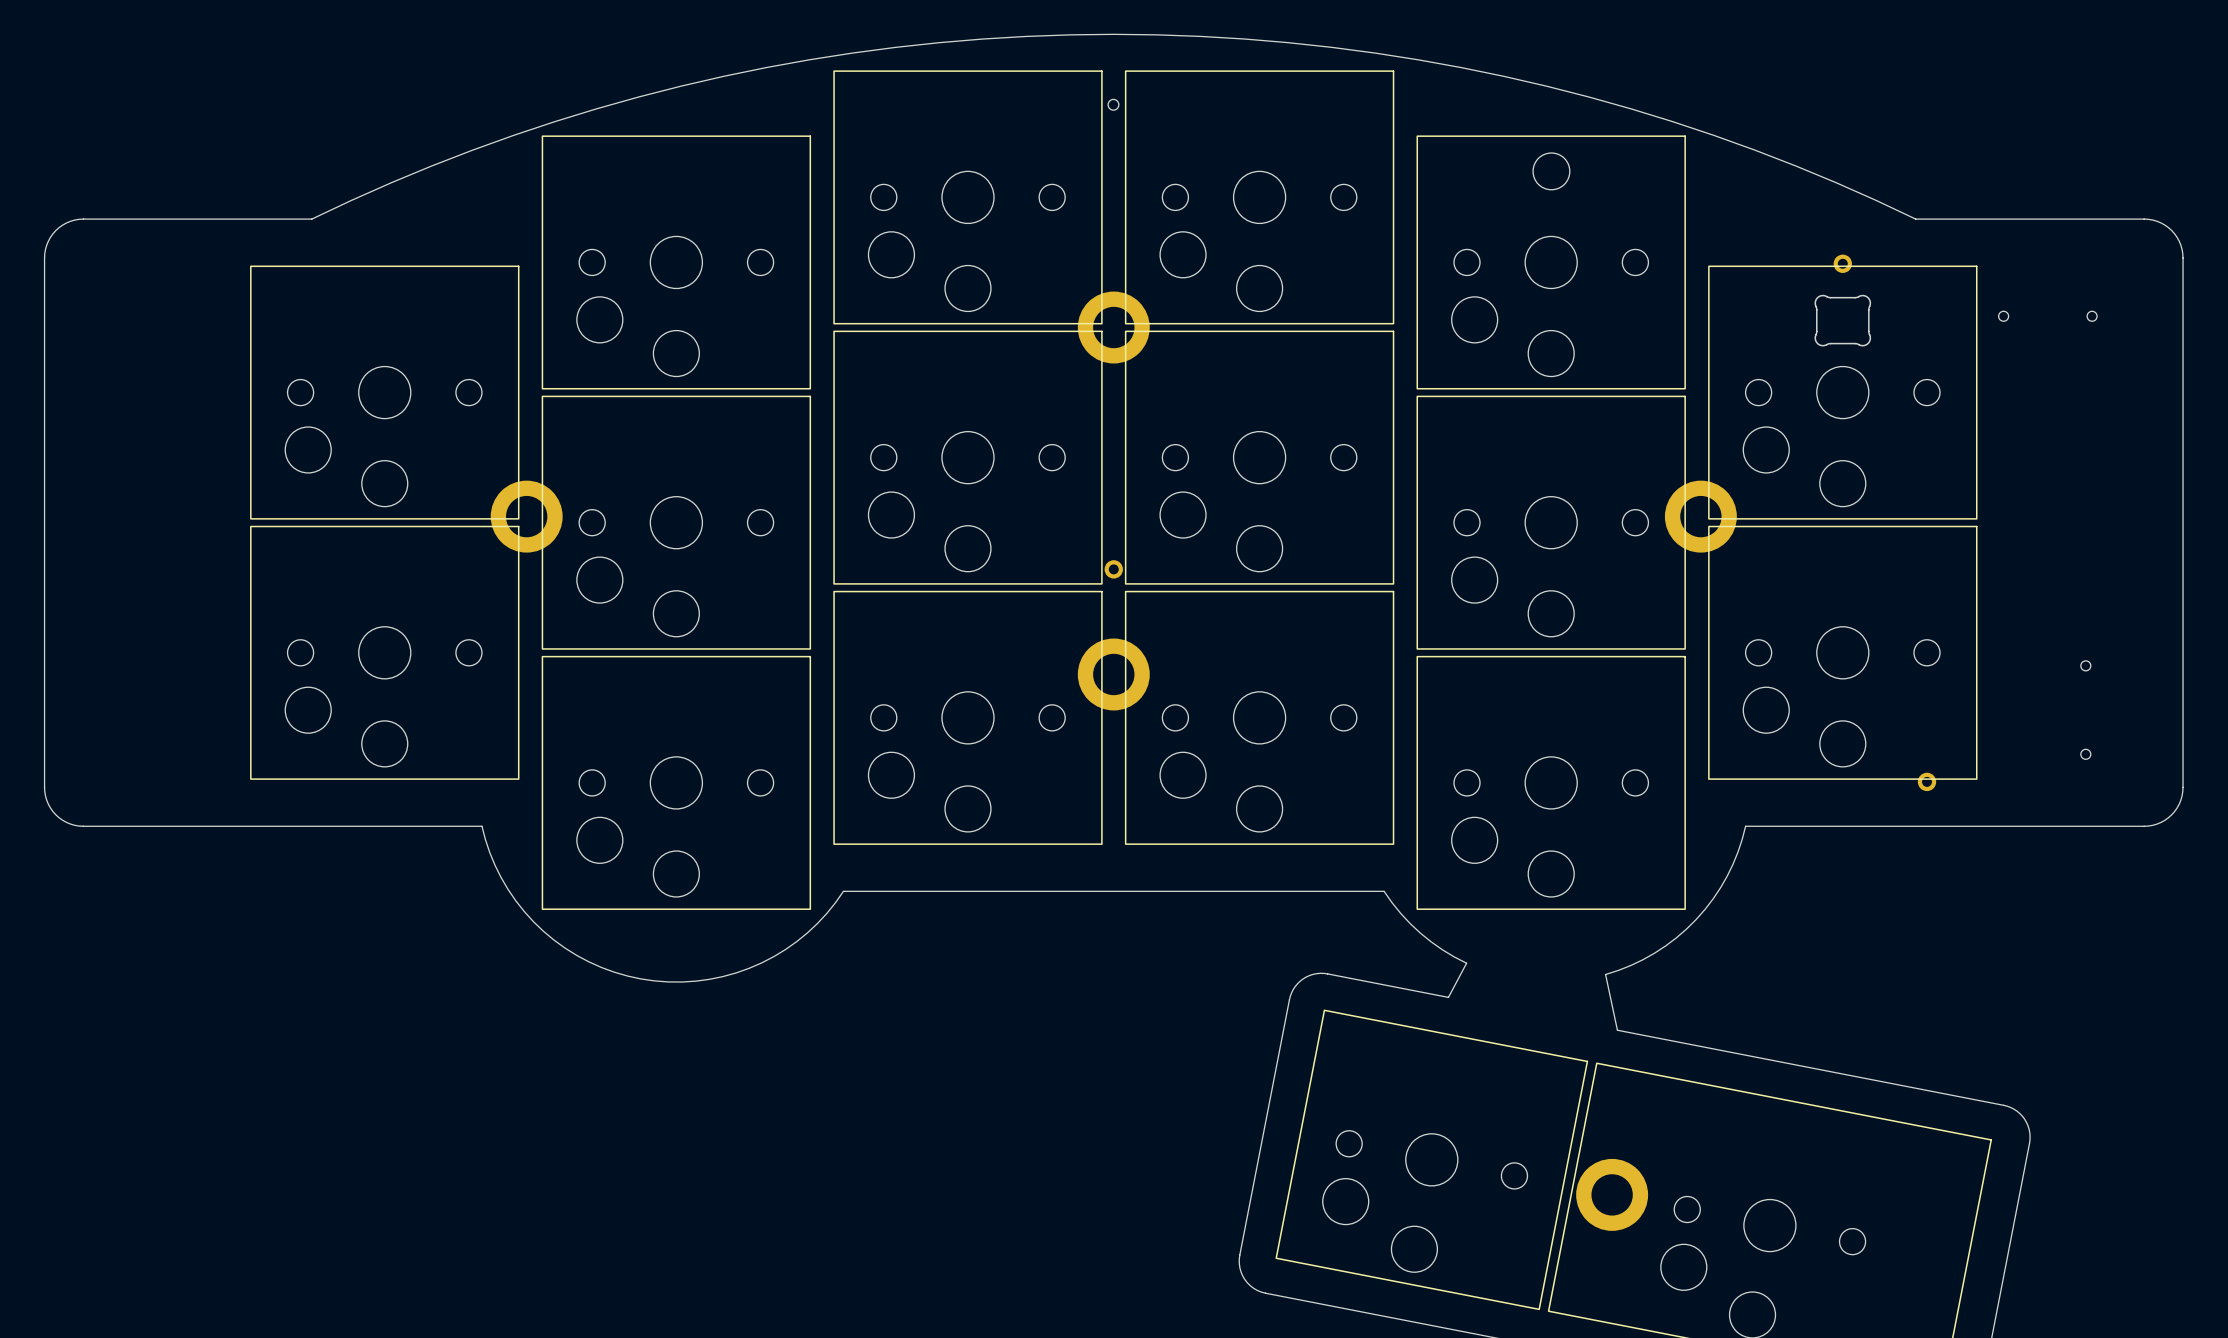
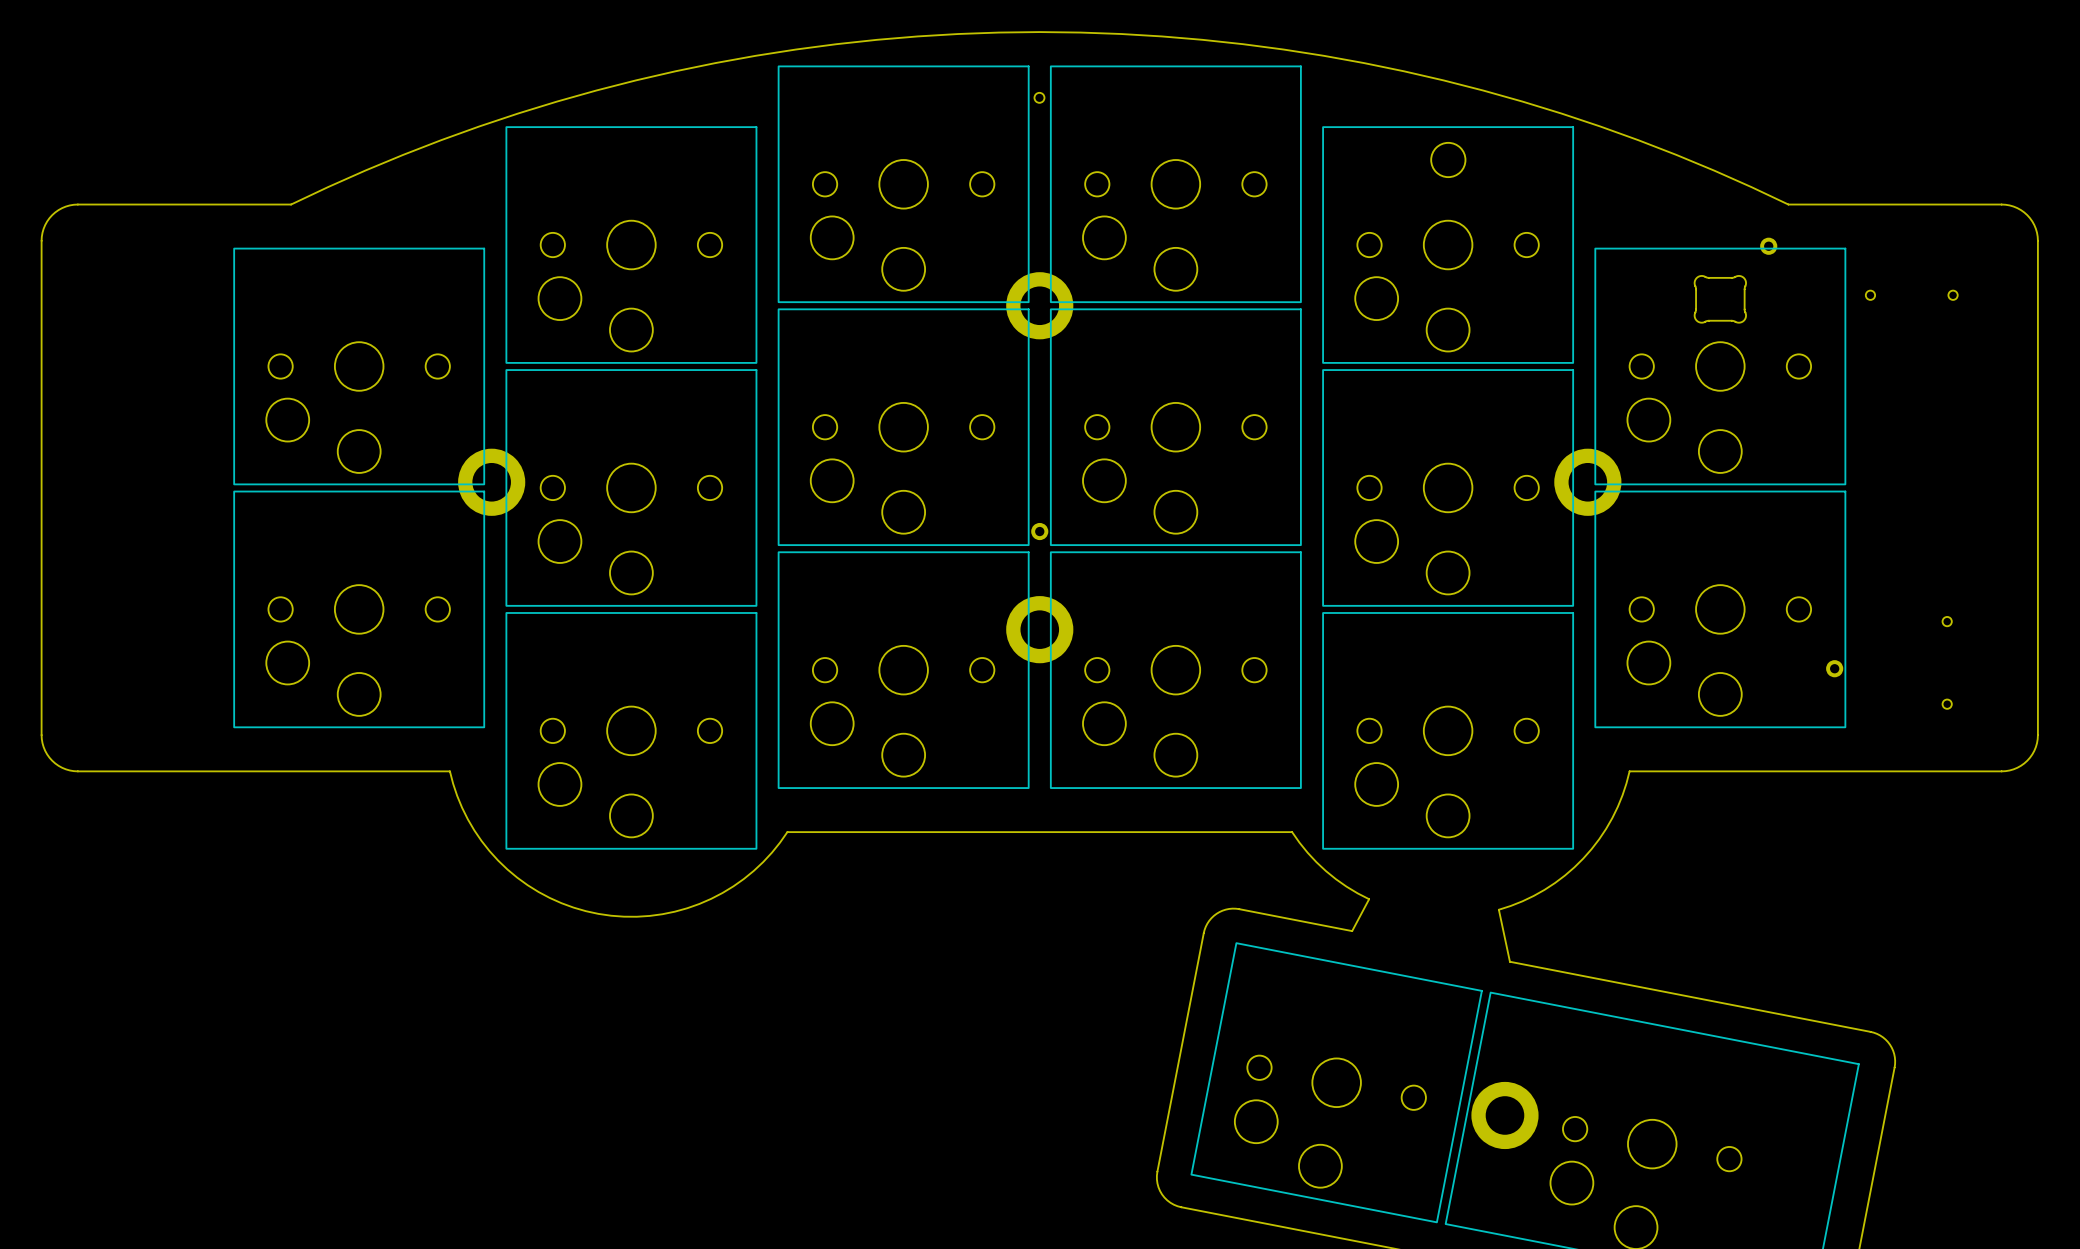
part position: (1842, 263) -> (1768, 246)
part position: (1927, 781) -> (1834, 668)

